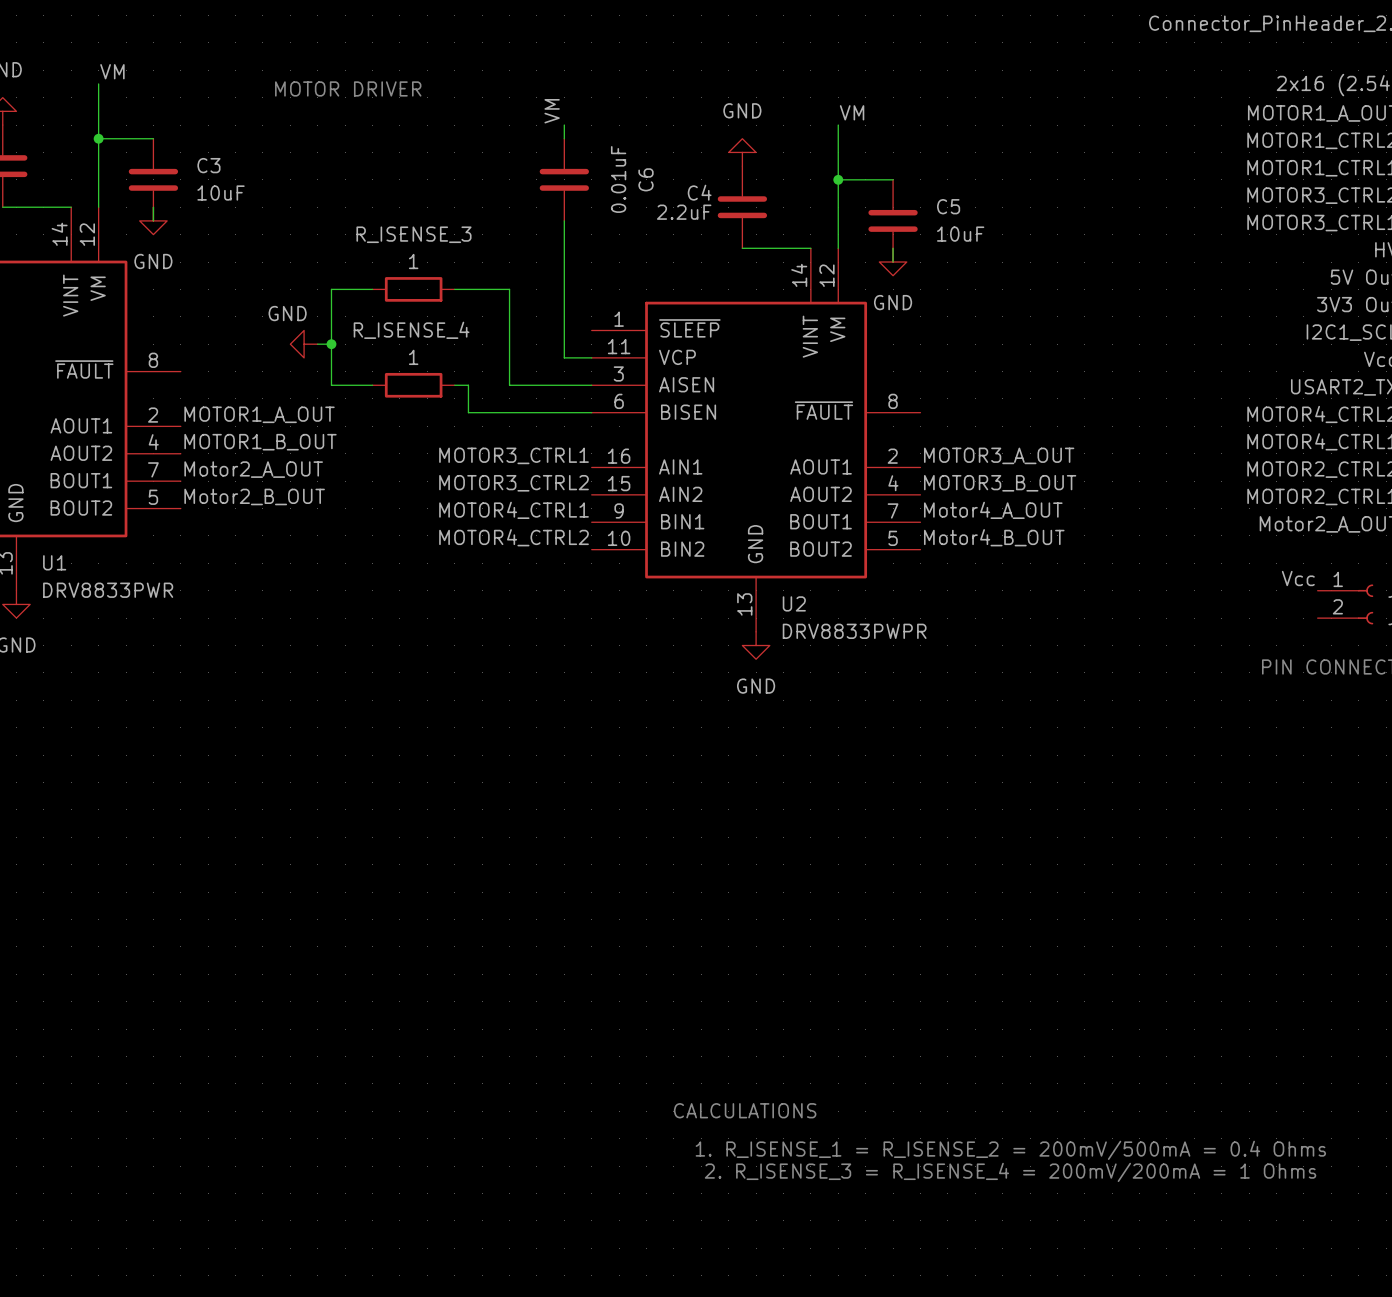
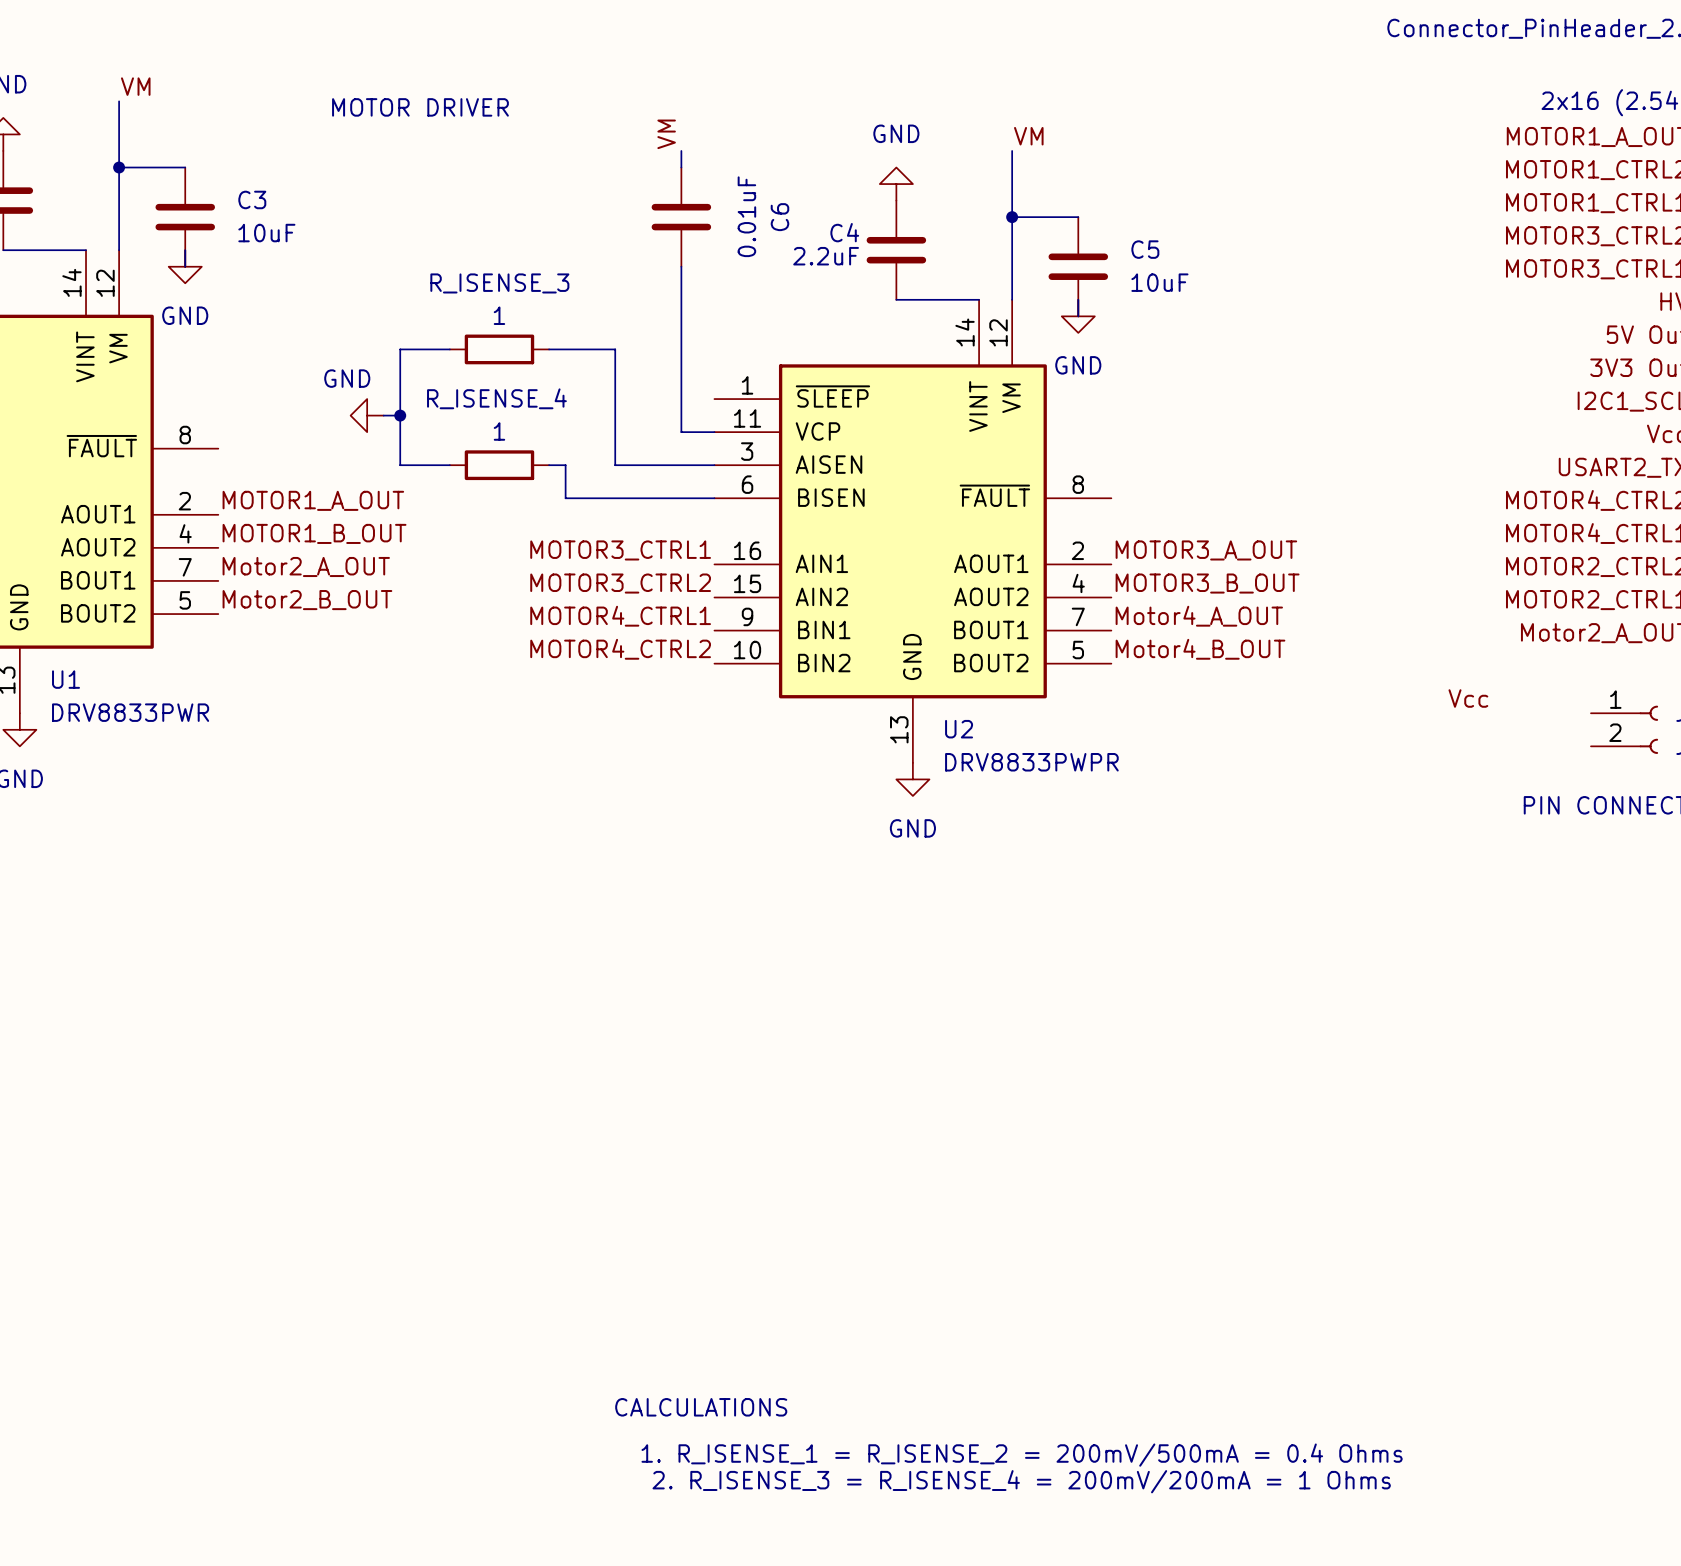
label position: Vcc (1298, 578) -> Vcc (1468, 698)
text position: CALCULATIONS (745, 1110) -> CALCULATIONS (701, 1407)
text position: 1. R_ISENSE_1 = R_ISENSE_2 = 200mV/500mA = 0.4 Ohms (1010, 1150) -> 1. R_ISENSE_1 = R_ISENSE_2 = 200mV/500mA = 0.4 Ohms (1022, 1455)
text position: 2. R_ISENSE_3 = R_ISENSE_4 = 200mV/200mA = 1 Ohms (1010, 1172) -> 2. R_ISENSE_3 = R_ISENSE_4 = 200mV/200mA = 1 Ohms (1021, 1481)

